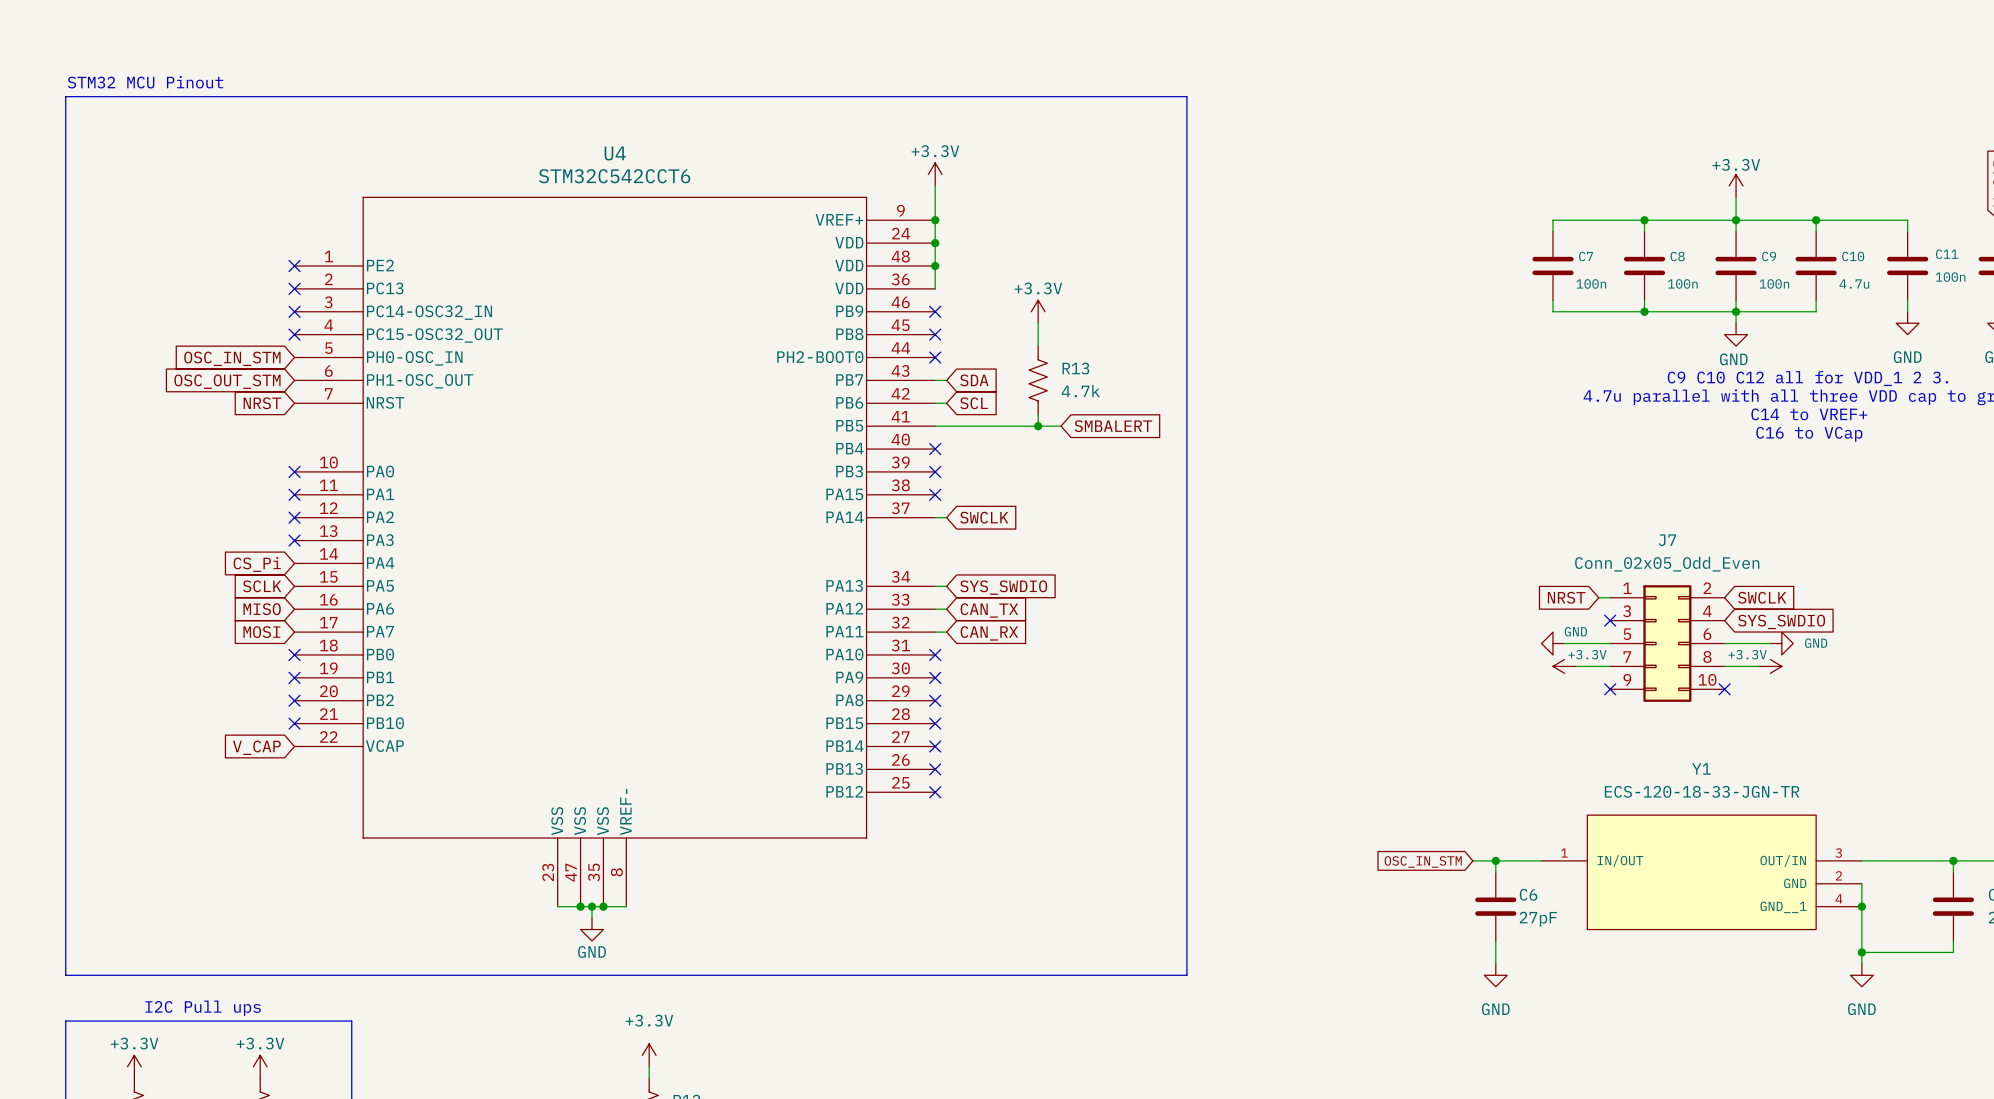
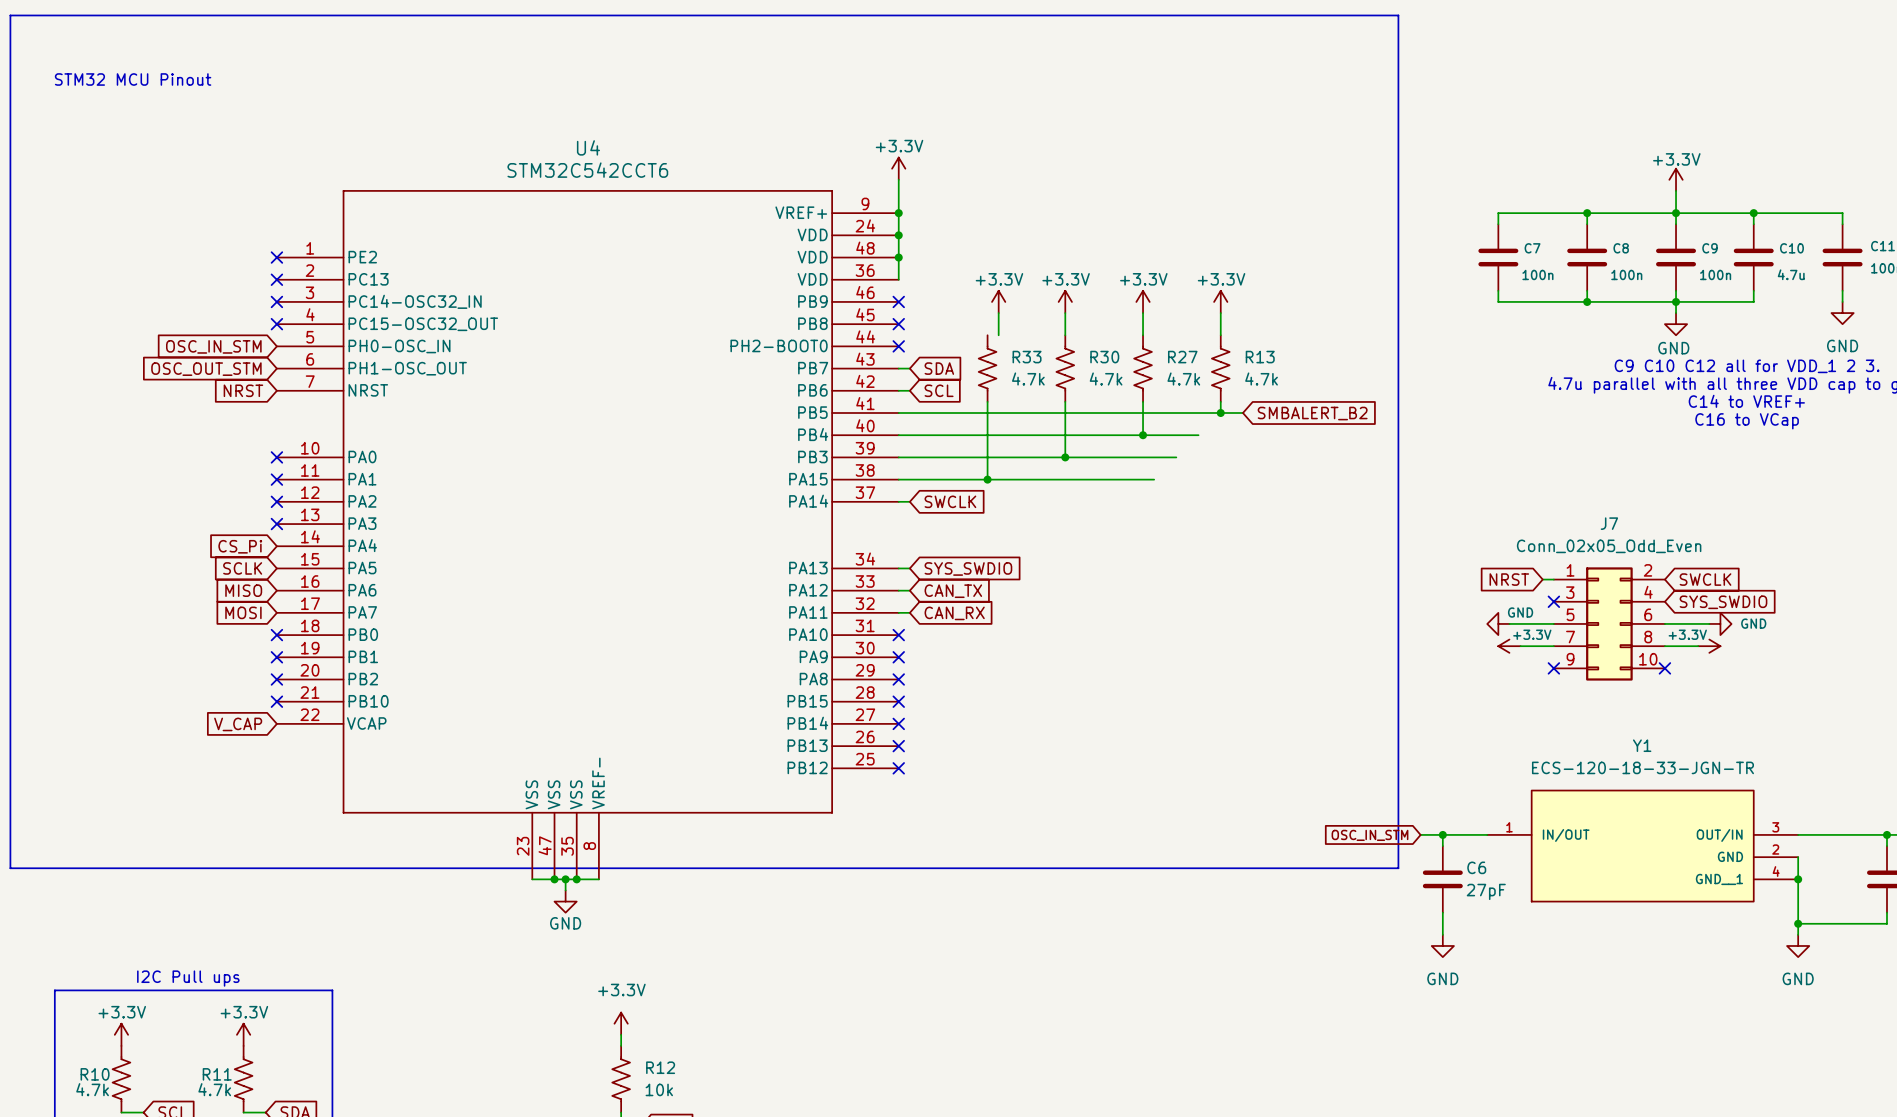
line: (65, 96) (1186, 96) (1186, 975) (65, 975) (65, 96) -> (10, 15) (10, 868) (1398, 868) (1398, 15) (10, 15)
power symbol: none -> +3.3V (1065, 301)
power symbol: none -> +3.3V (1143, 301)
power symbol: none -> +3.3V (1220, 301)
wire: none -> (1065, 313) (1065, 335)
wire: none -> (1220, 313) (1220, 335)
R33: none -> 4.7k (987, 368)
R13 position: (1038, 380) -> (1220, 368)
R30: none -> 4.7k (1065, 368)
R27: none -> 4.7k (1143, 368)
wire: none -> (987, 401) (987, 479)
wire: (1038, 414) (1038, 426) -> none
wire: none -> (1065, 401) (1065, 457)
wire: none -> (1220, 401) (1220, 413)
junction: (1038, 426) -> none
wire: none -> (1020, 413) (1242, 413)
global label: SMBALERT (1113, 426) -> none
junction: none -> (1220, 413)
global label: none -> SMBALERT_B2 (1312, 413)
wire: none -> (898, 435) (1198, 435)
no-connect mark: (935, 449) -> none
junction: none -> (1143, 435)
wire: none -> (898, 457) (1176, 457)
no-connect mark: (935, 471) -> none
junction: none -> (1065, 457)
wire: none -> (898, 479) (1154, 479)
no-connect mark: (935, 494) -> none
junction: none -> (987, 479)

